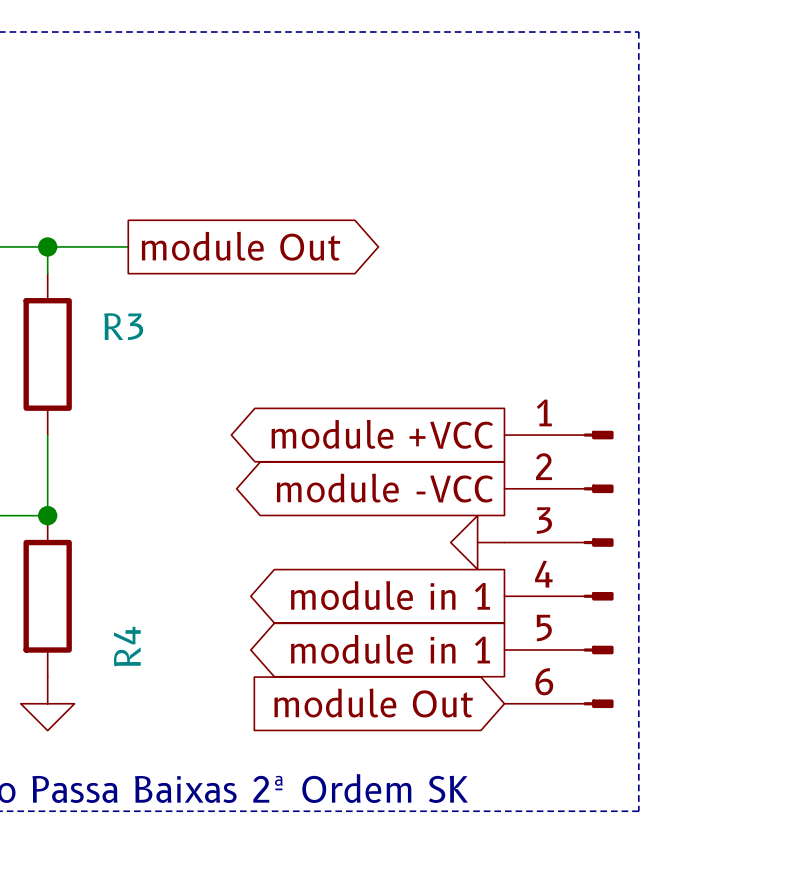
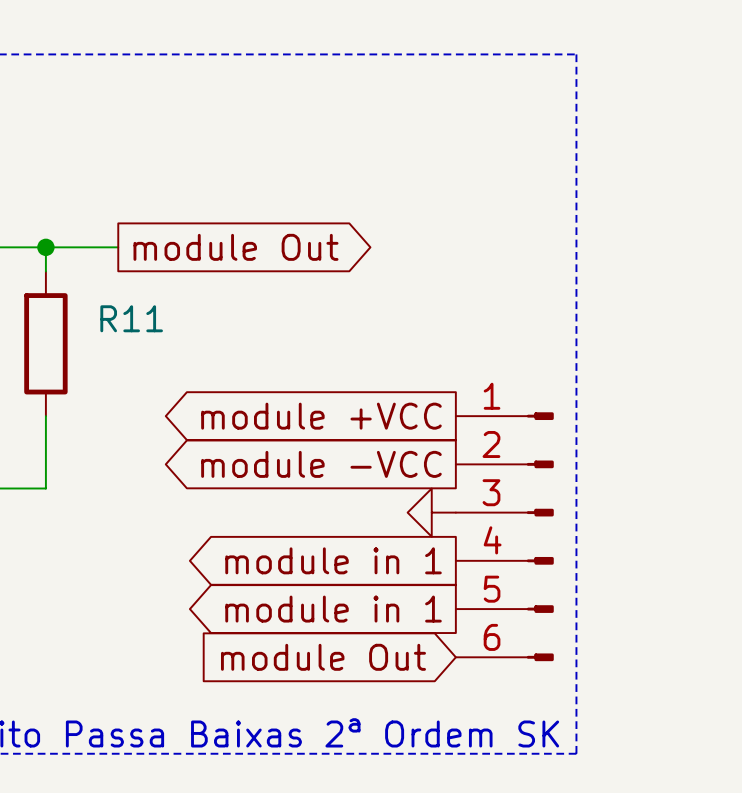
R3 name: R3 (123, 326) -> R11 (131, 318)
junction: (47, 515) -> none
R4: (47, 596) -> none
power symbol: (47, 703) -> none

